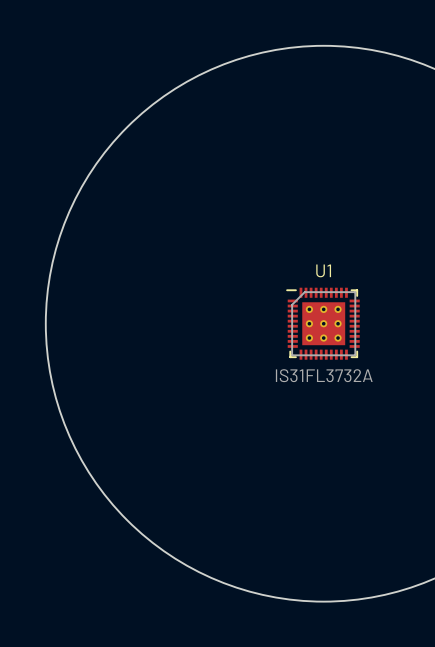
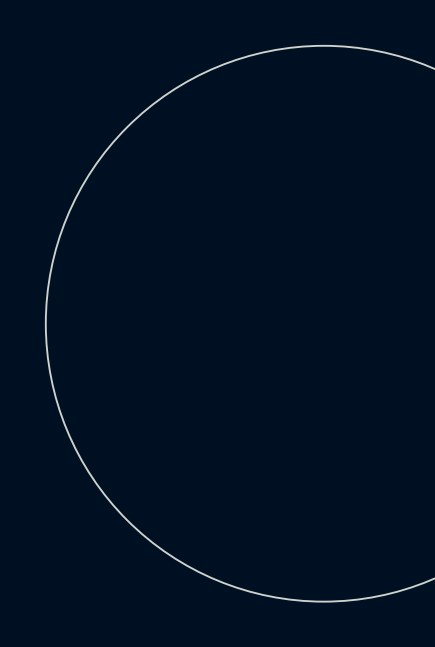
U1: IS31FL3732A (323, 323) -> none

